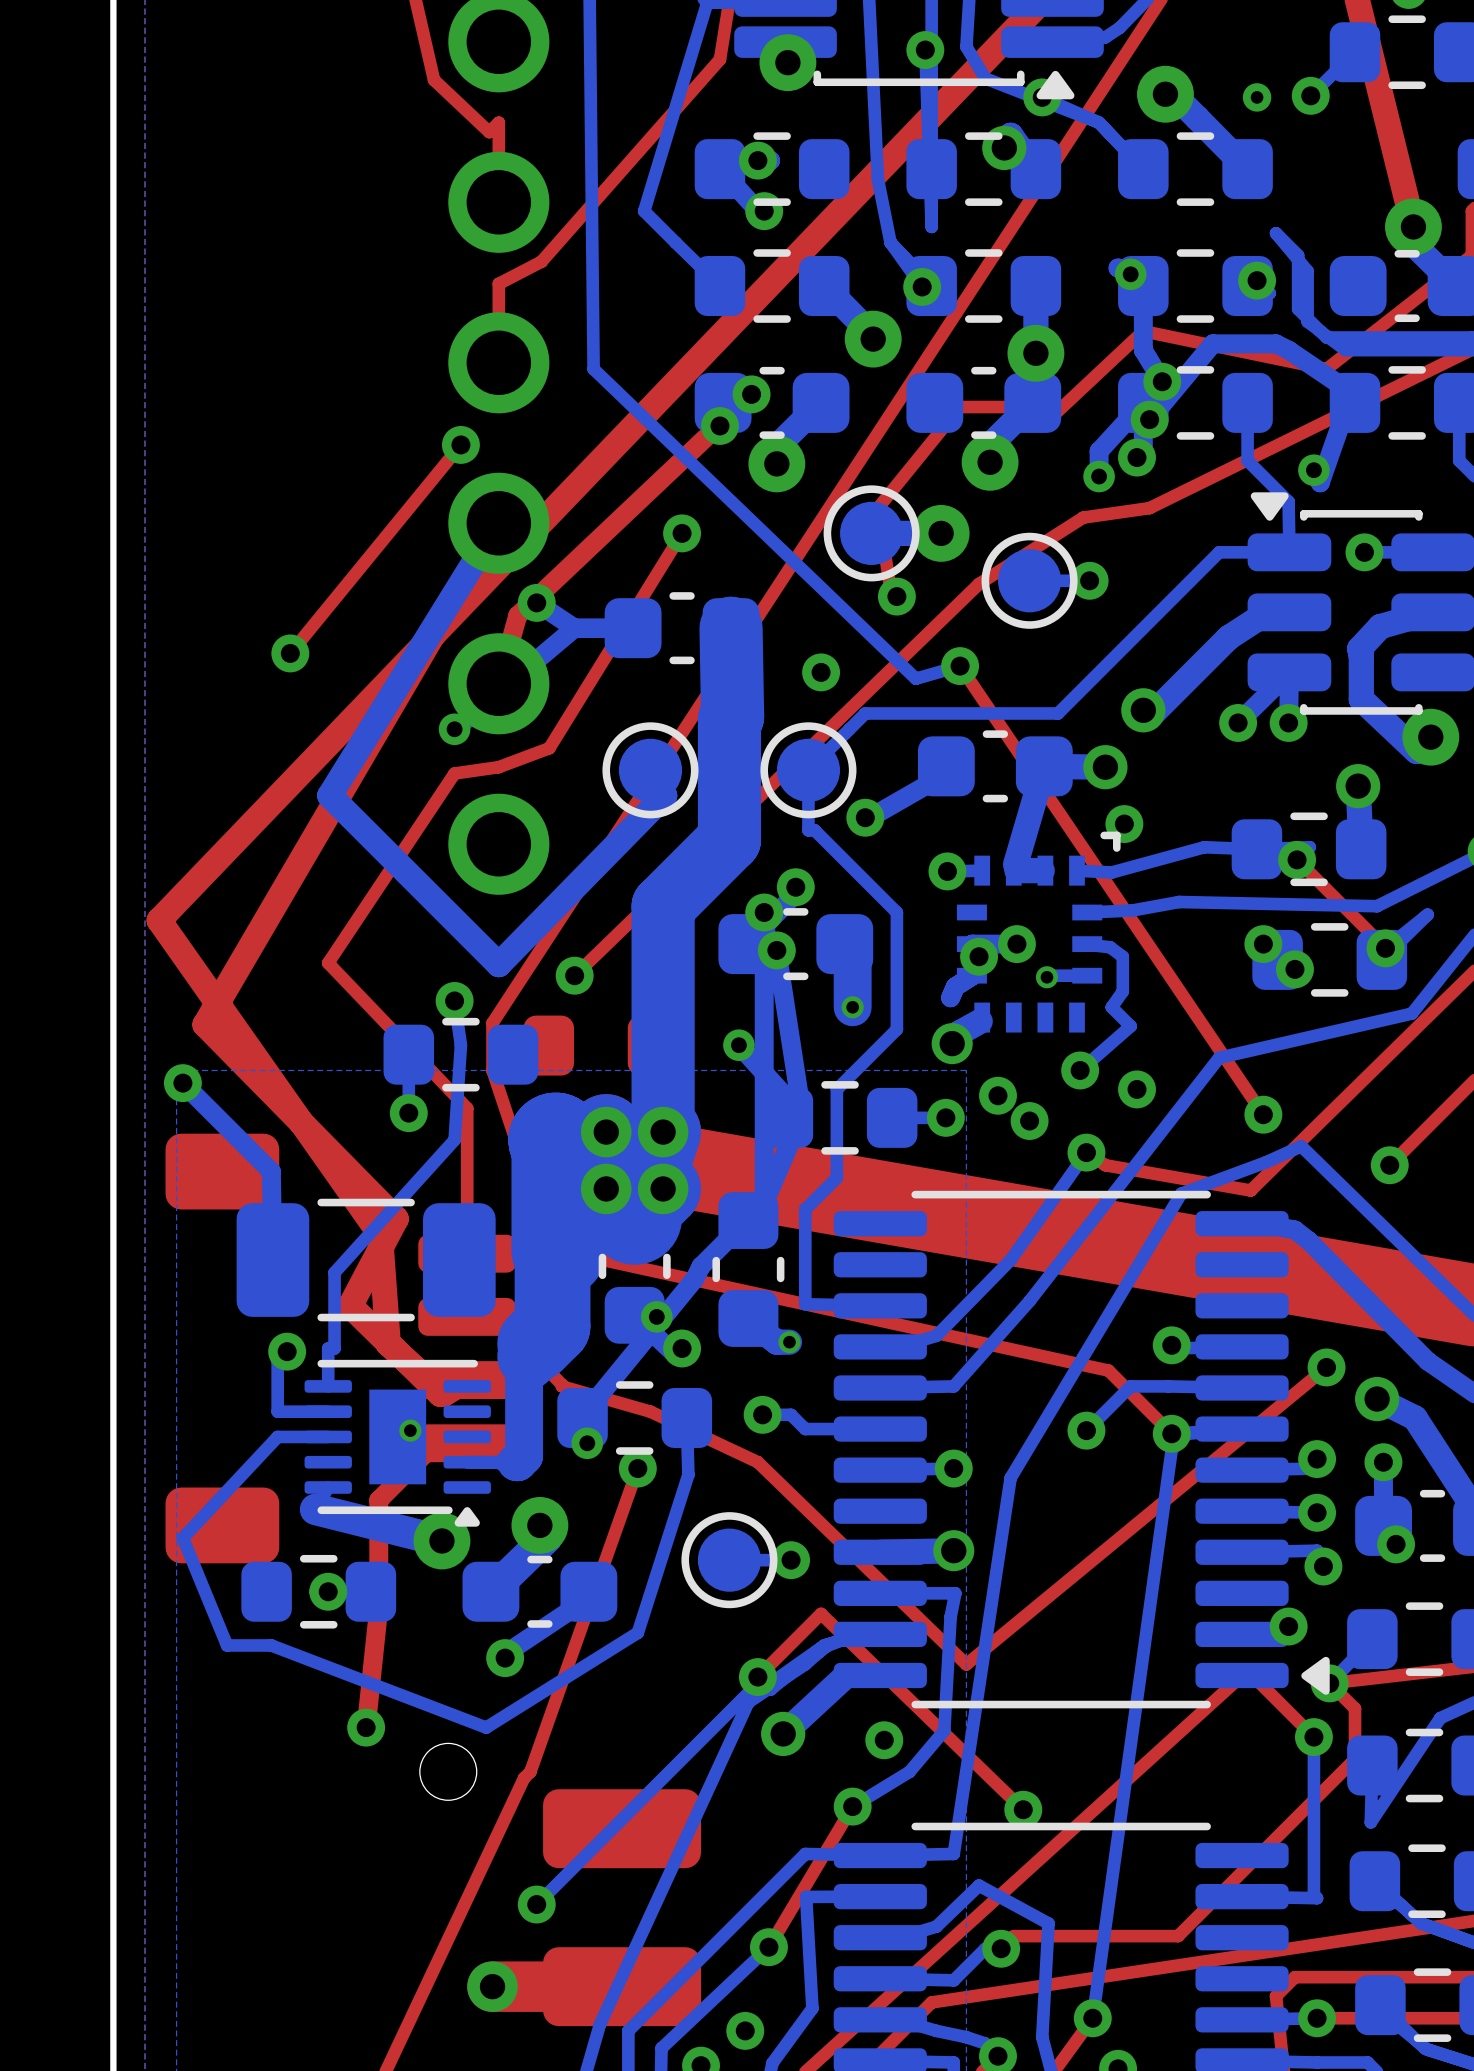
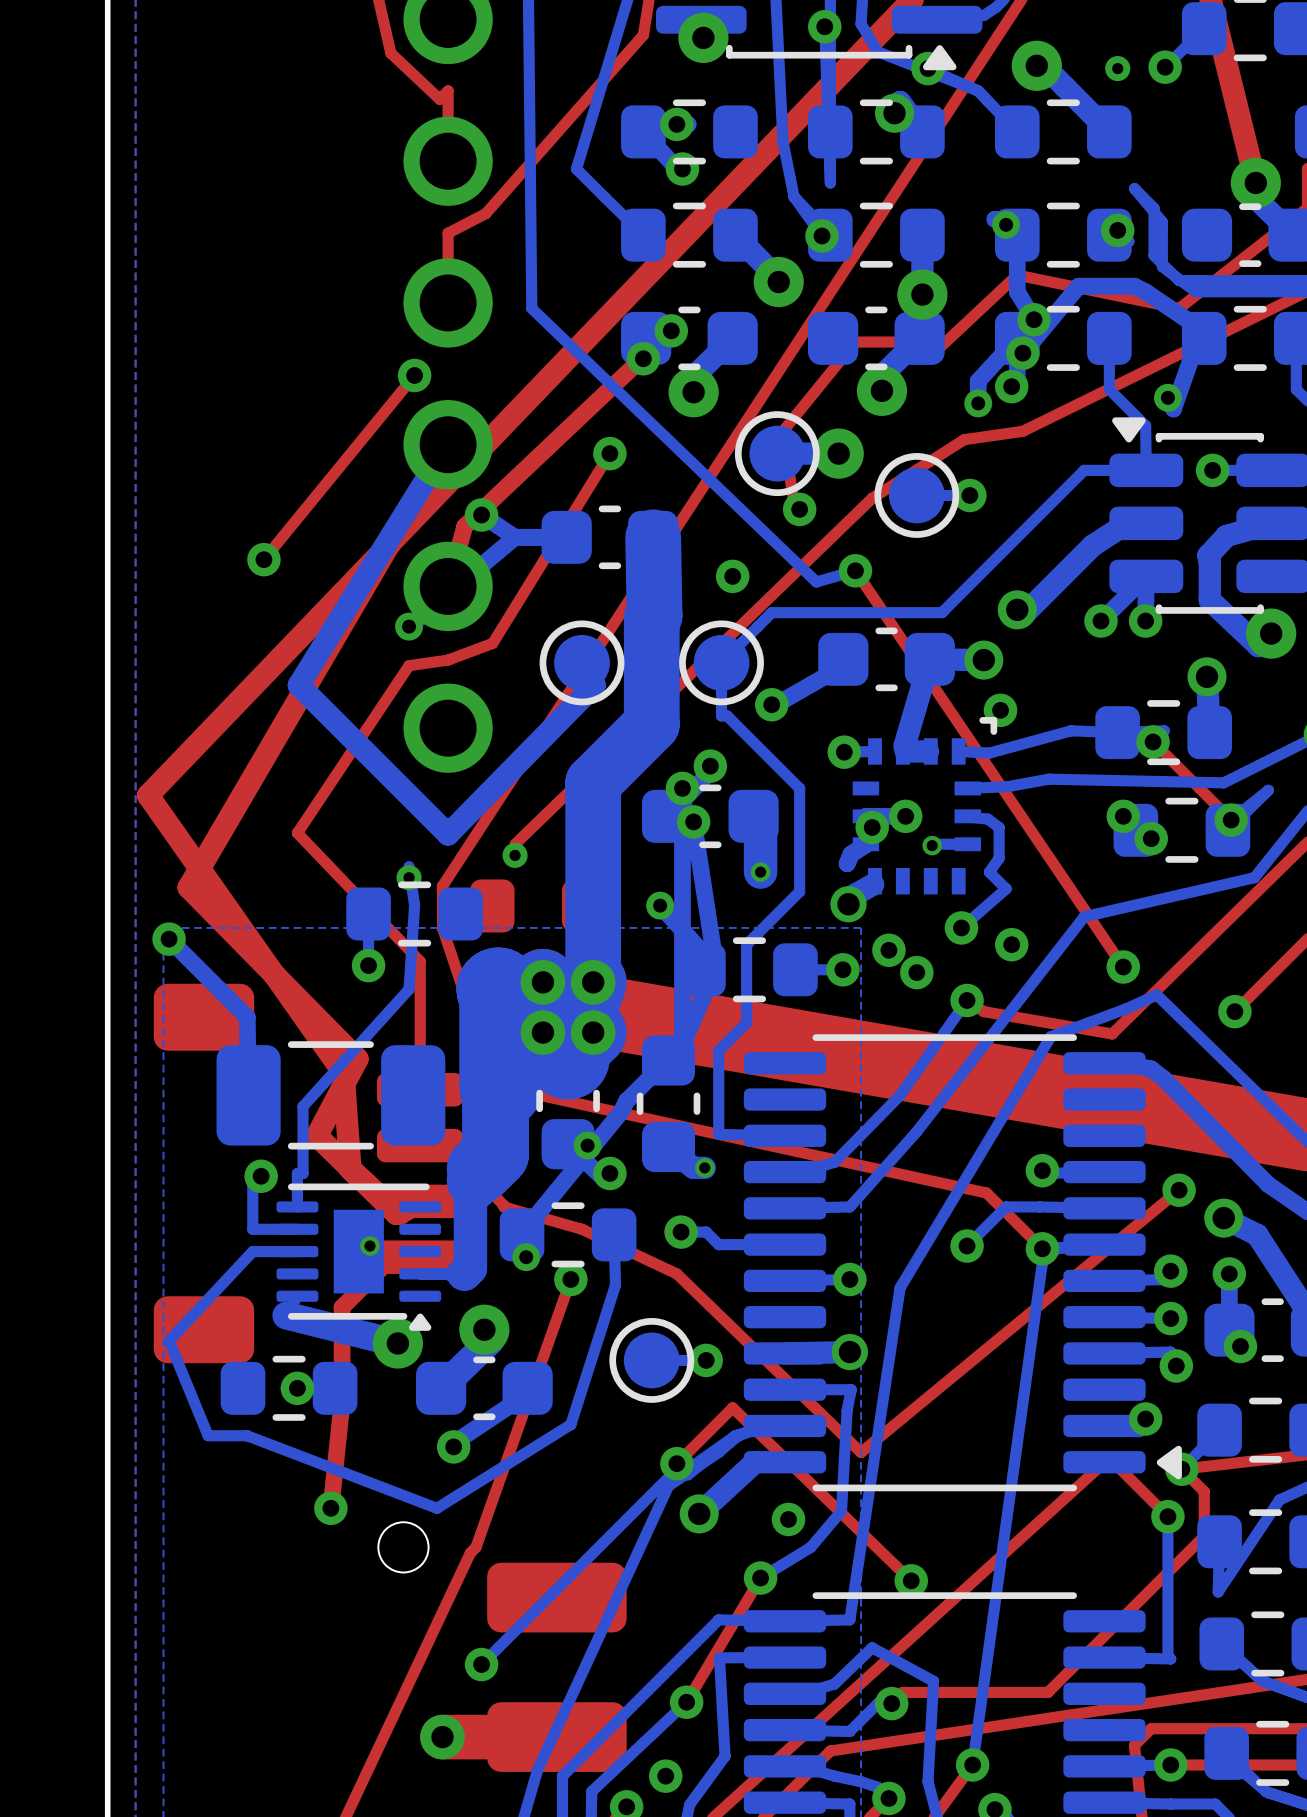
via size: [555, 956, 594, 995] -> [502, 842, 528, 868]
via size: [435, 982, 474, 1020] -> [396, 865, 422, 891]

